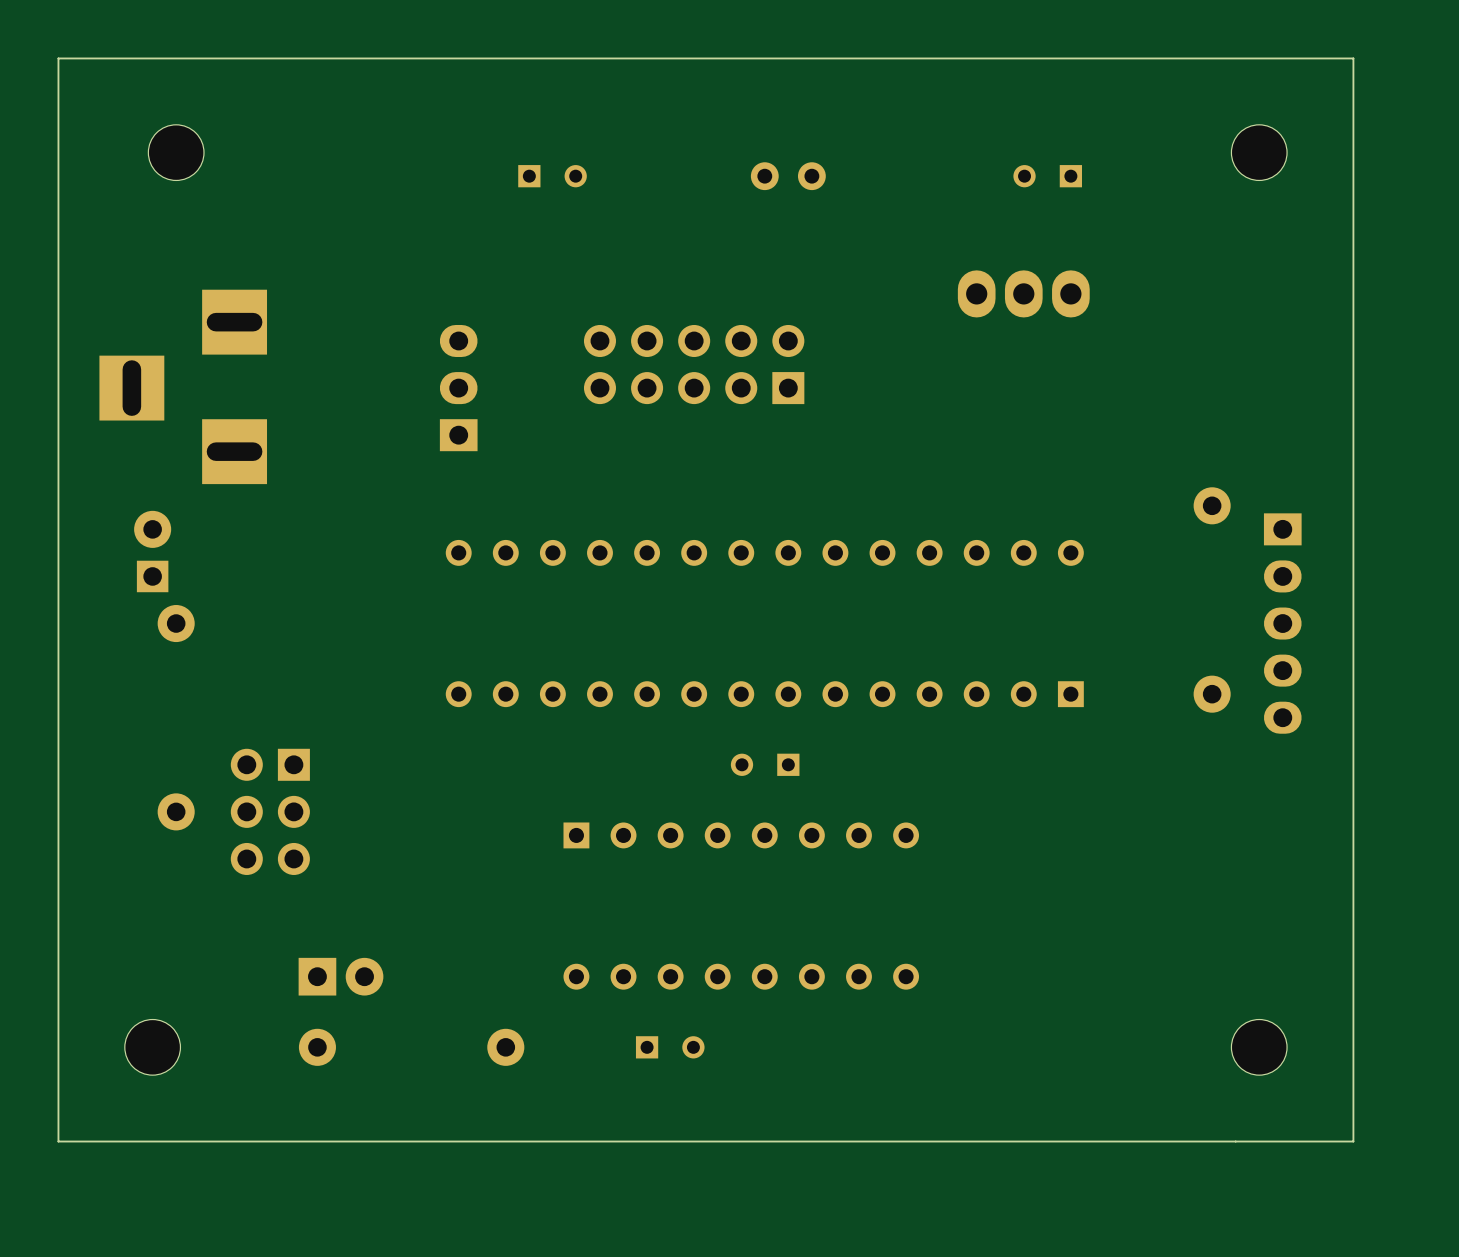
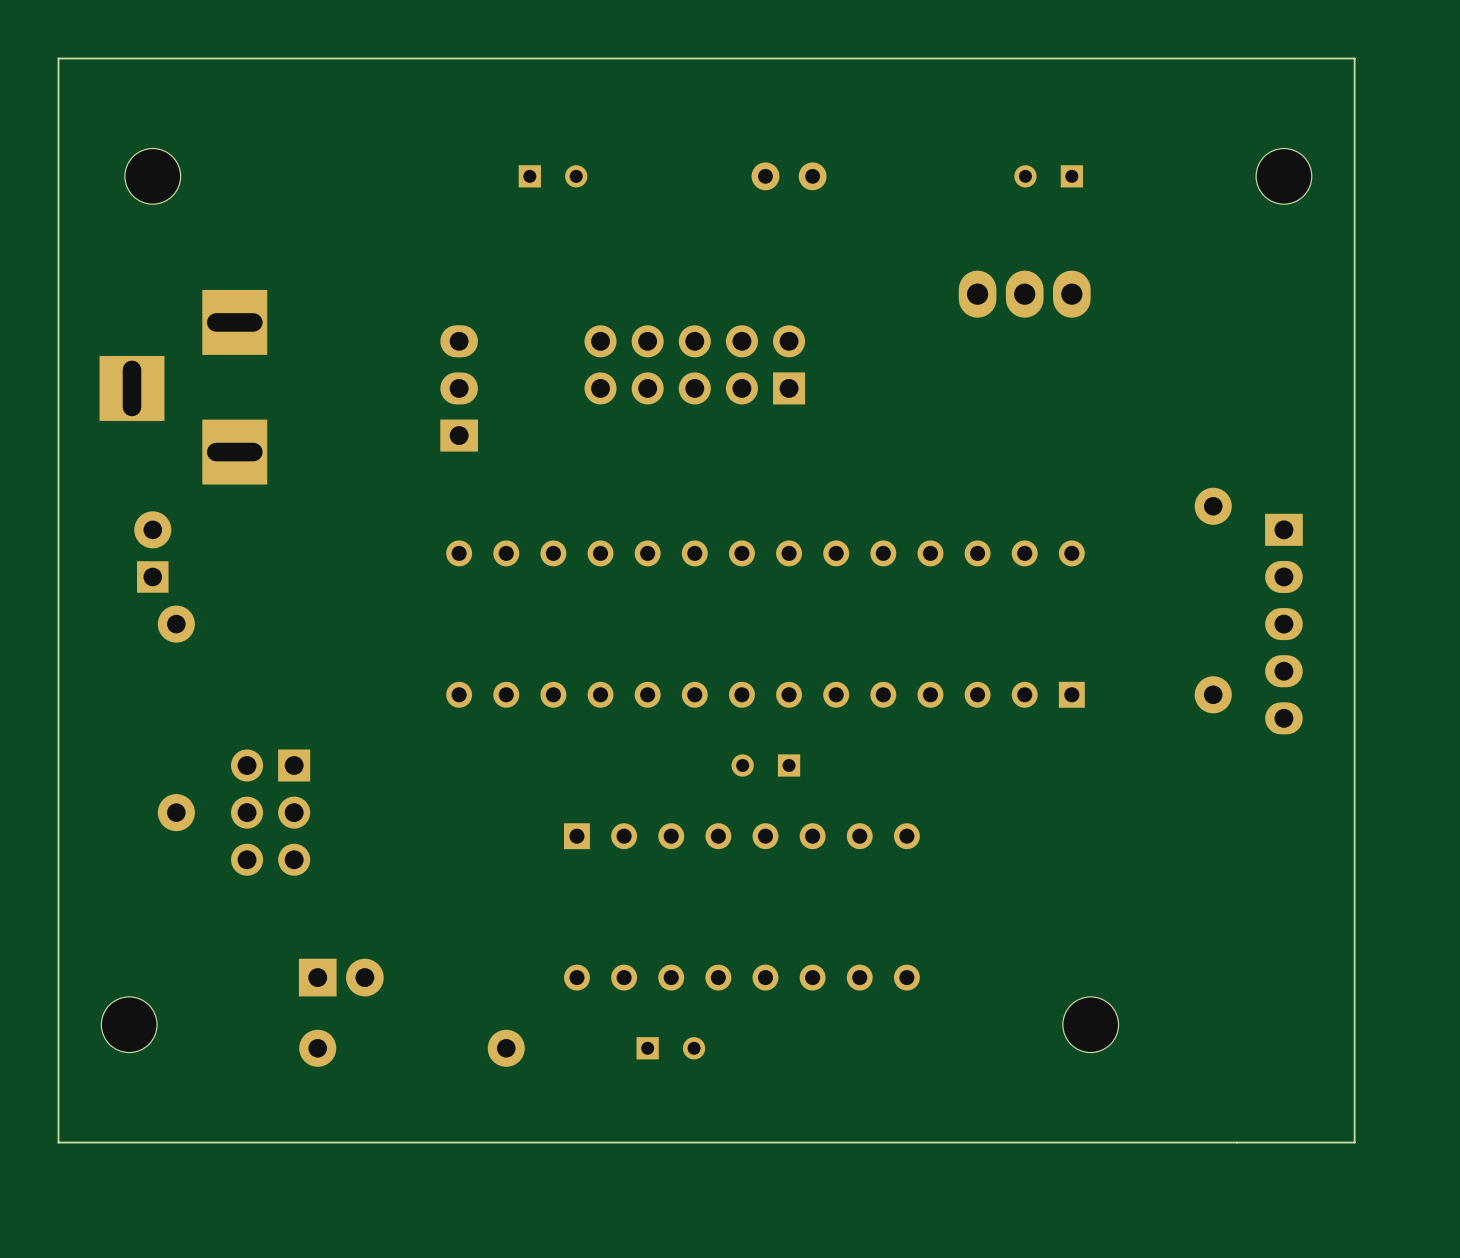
part position: (176, 152) -> (152, 176)
part position: (1259, 152) -> (1283, 176)
part position: (152, 1047) -> (129, 1024)
part position: (1259, 1047) -> (1090, 1024)

